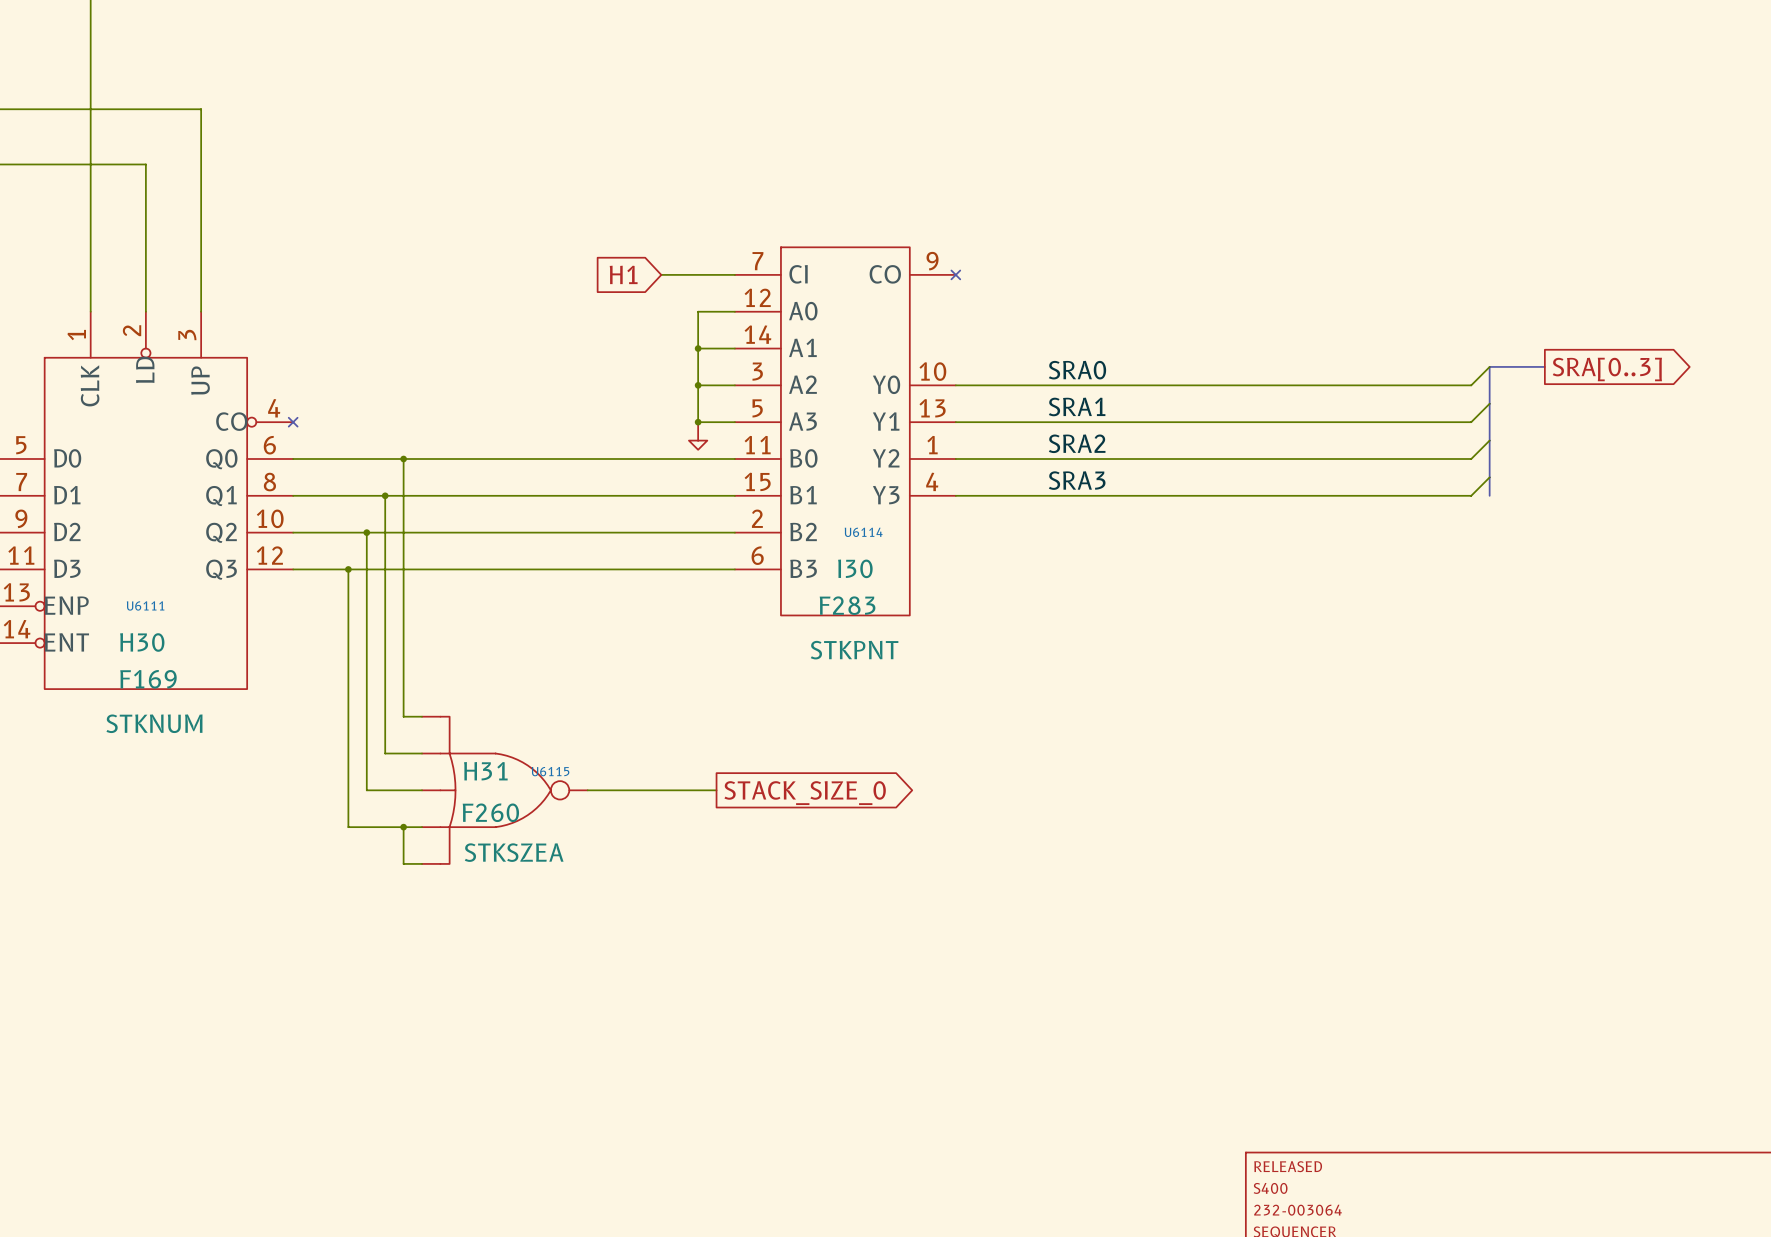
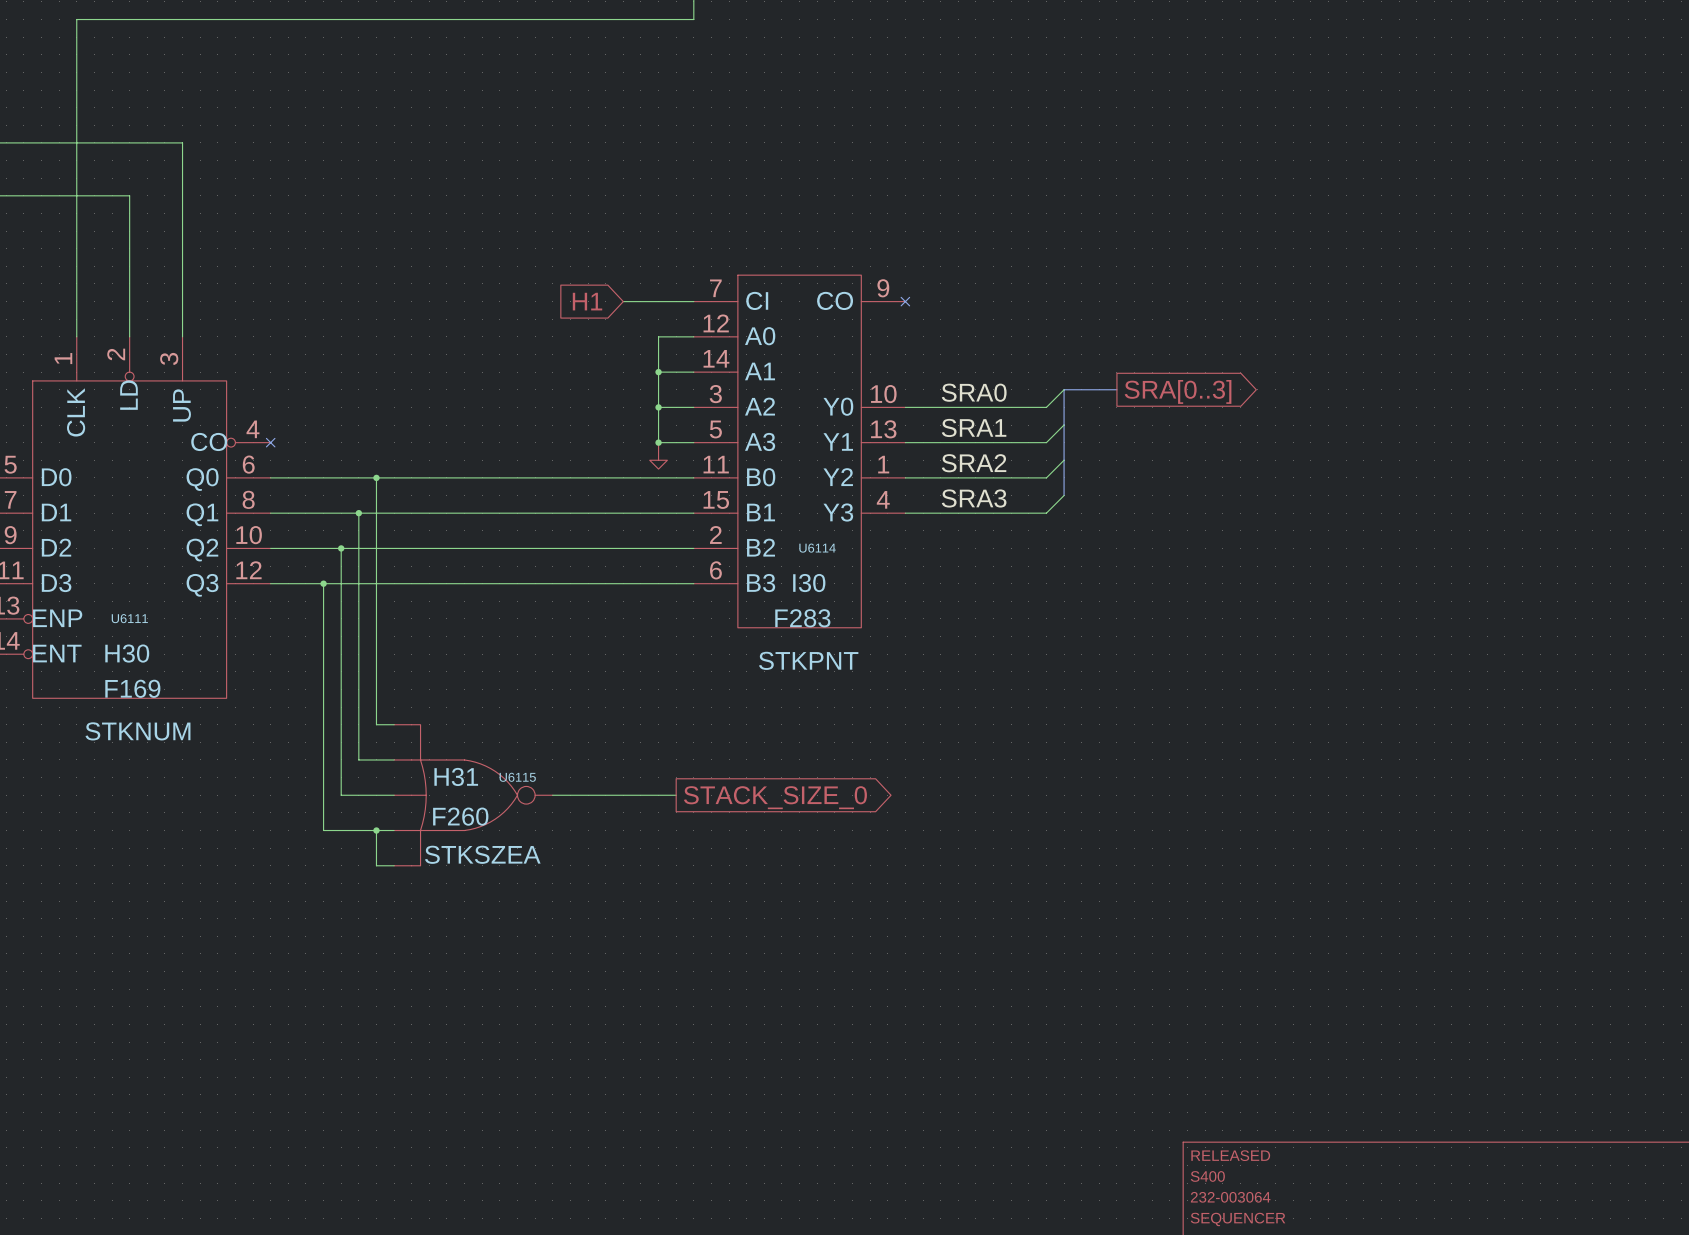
bus: none -> (1116, 389) (1064, 389) (1064, 495)
wire: (1489, 366) (1471, 385) (1103, 385) -> (1064, 389) (1046, 407)
bus: (1544, 366) (1489, 366) (1489, 495) -> none
global label: none -> SRA[0..3] (1178, 391)
global label: SRA[0..3] (1607, 369) -> none
label position: SRA0 (1077, 370) -> SRA0 (974, 392)
wire: (1489, 403) (1471, 422) (1103, 422) -> (1064, 425) (1046, 442)
label position: SRA1 (1077, 406) -> SRA1 (974, 427)
wire: (1489, 440) (1471, 458) (1103, 458) -> (1064, 460) (1046, 477)
label position: SRA2 (1077, 443) -> SRA2 (974, 463)
wire: (1489, 477) (1471, 495) (1103, 495) -> (1064, 495) (1046, 513)
label position: SRA3 (1077, 480) -> SRA3 (974, 498)

